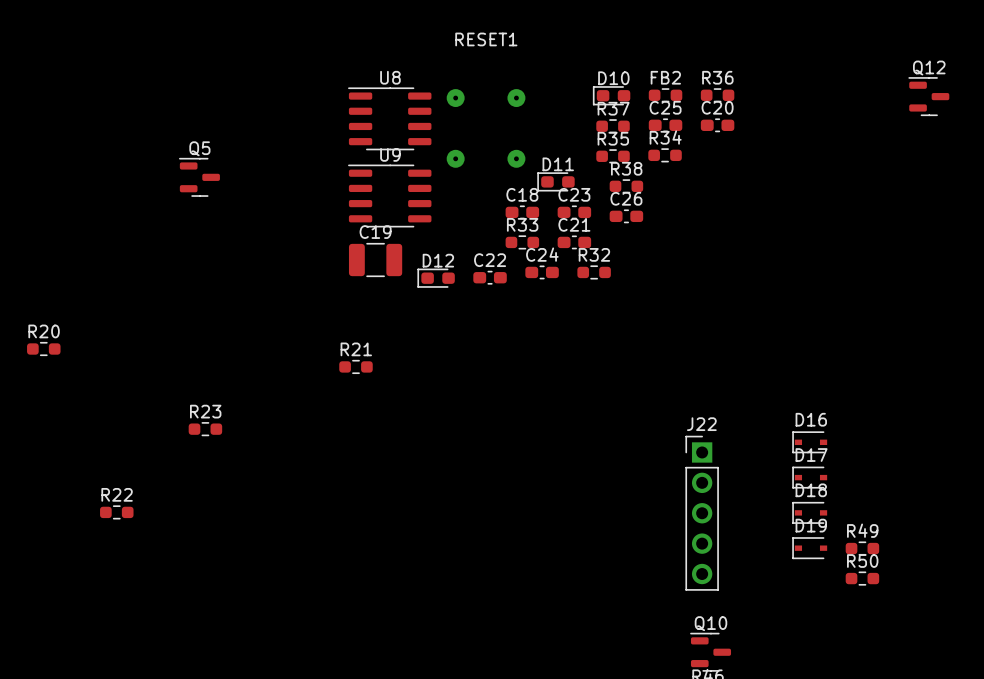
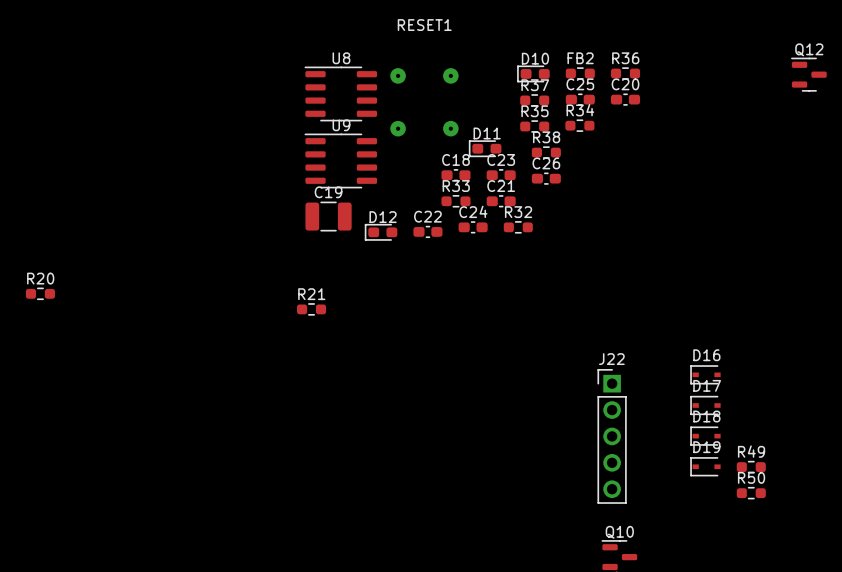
Q5: (199, 177) -> none
R23: (205, 429) -> none
R22: (116, 512) -> none

